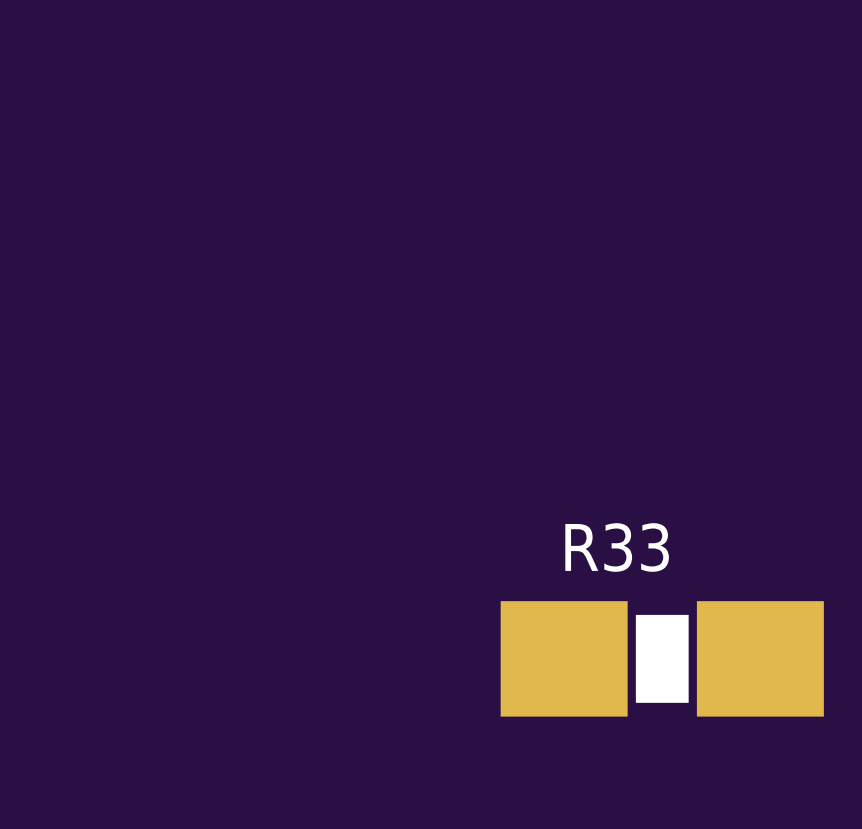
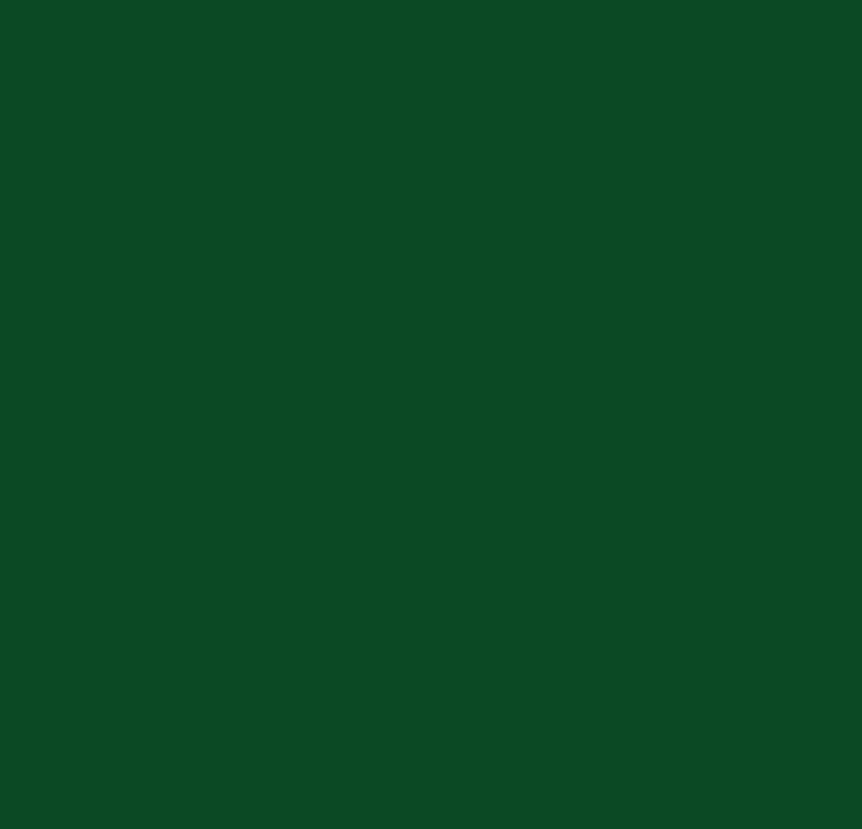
R33: (662, 658) -> none

